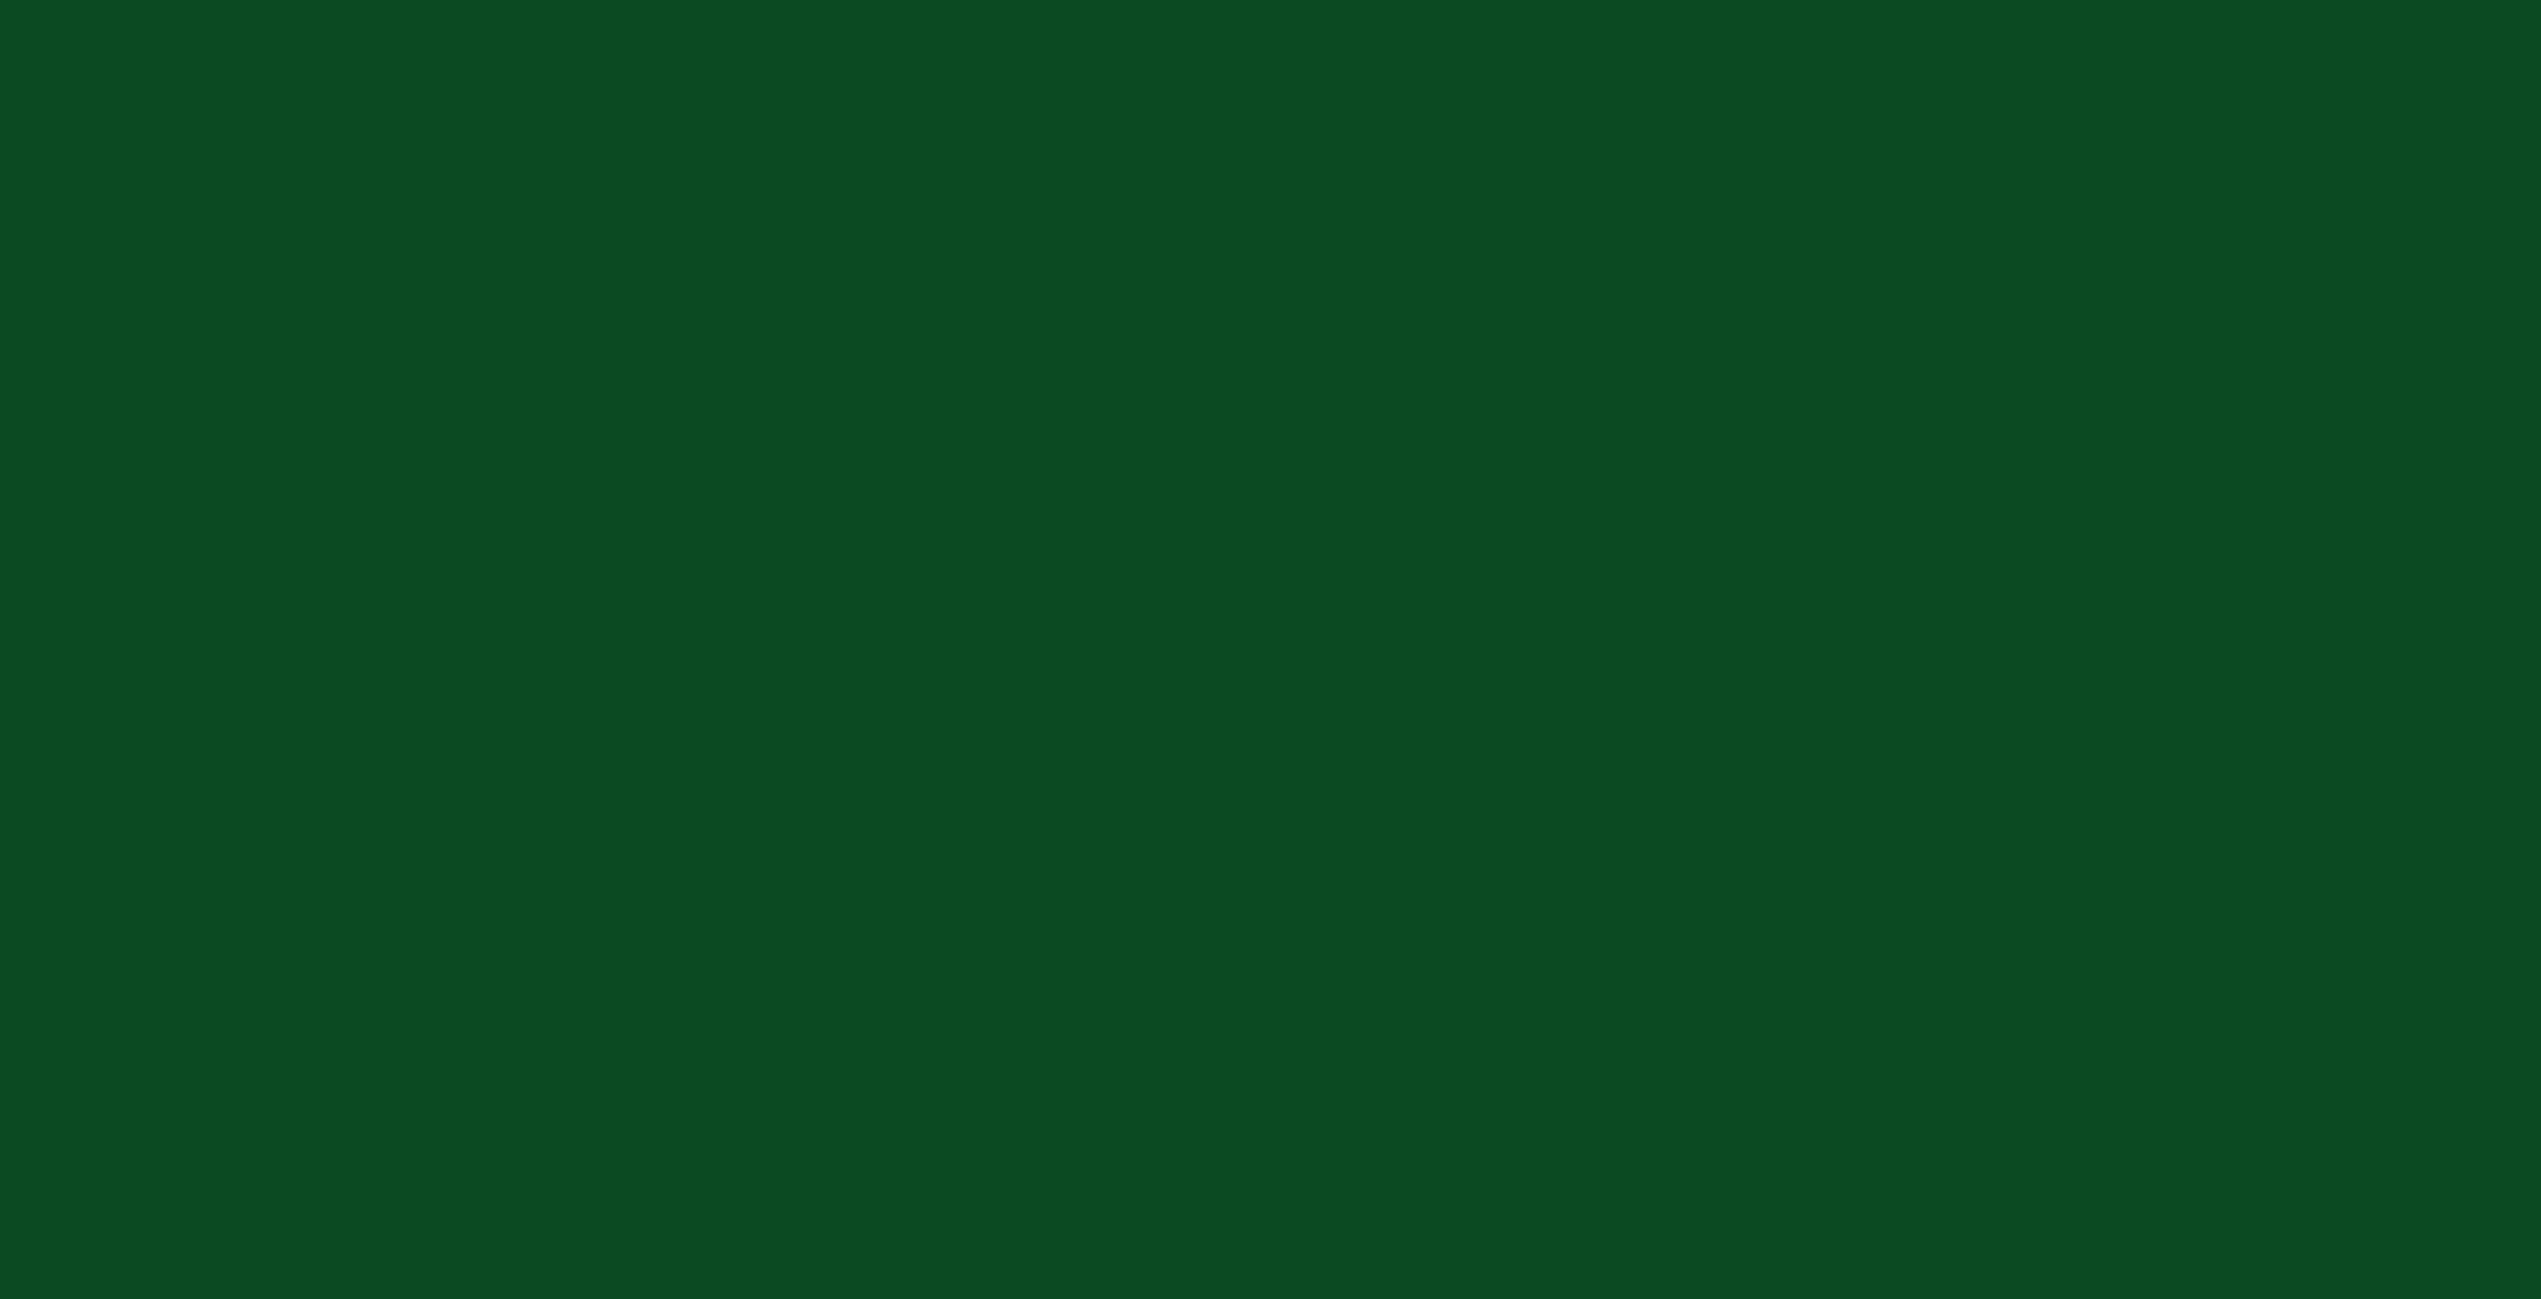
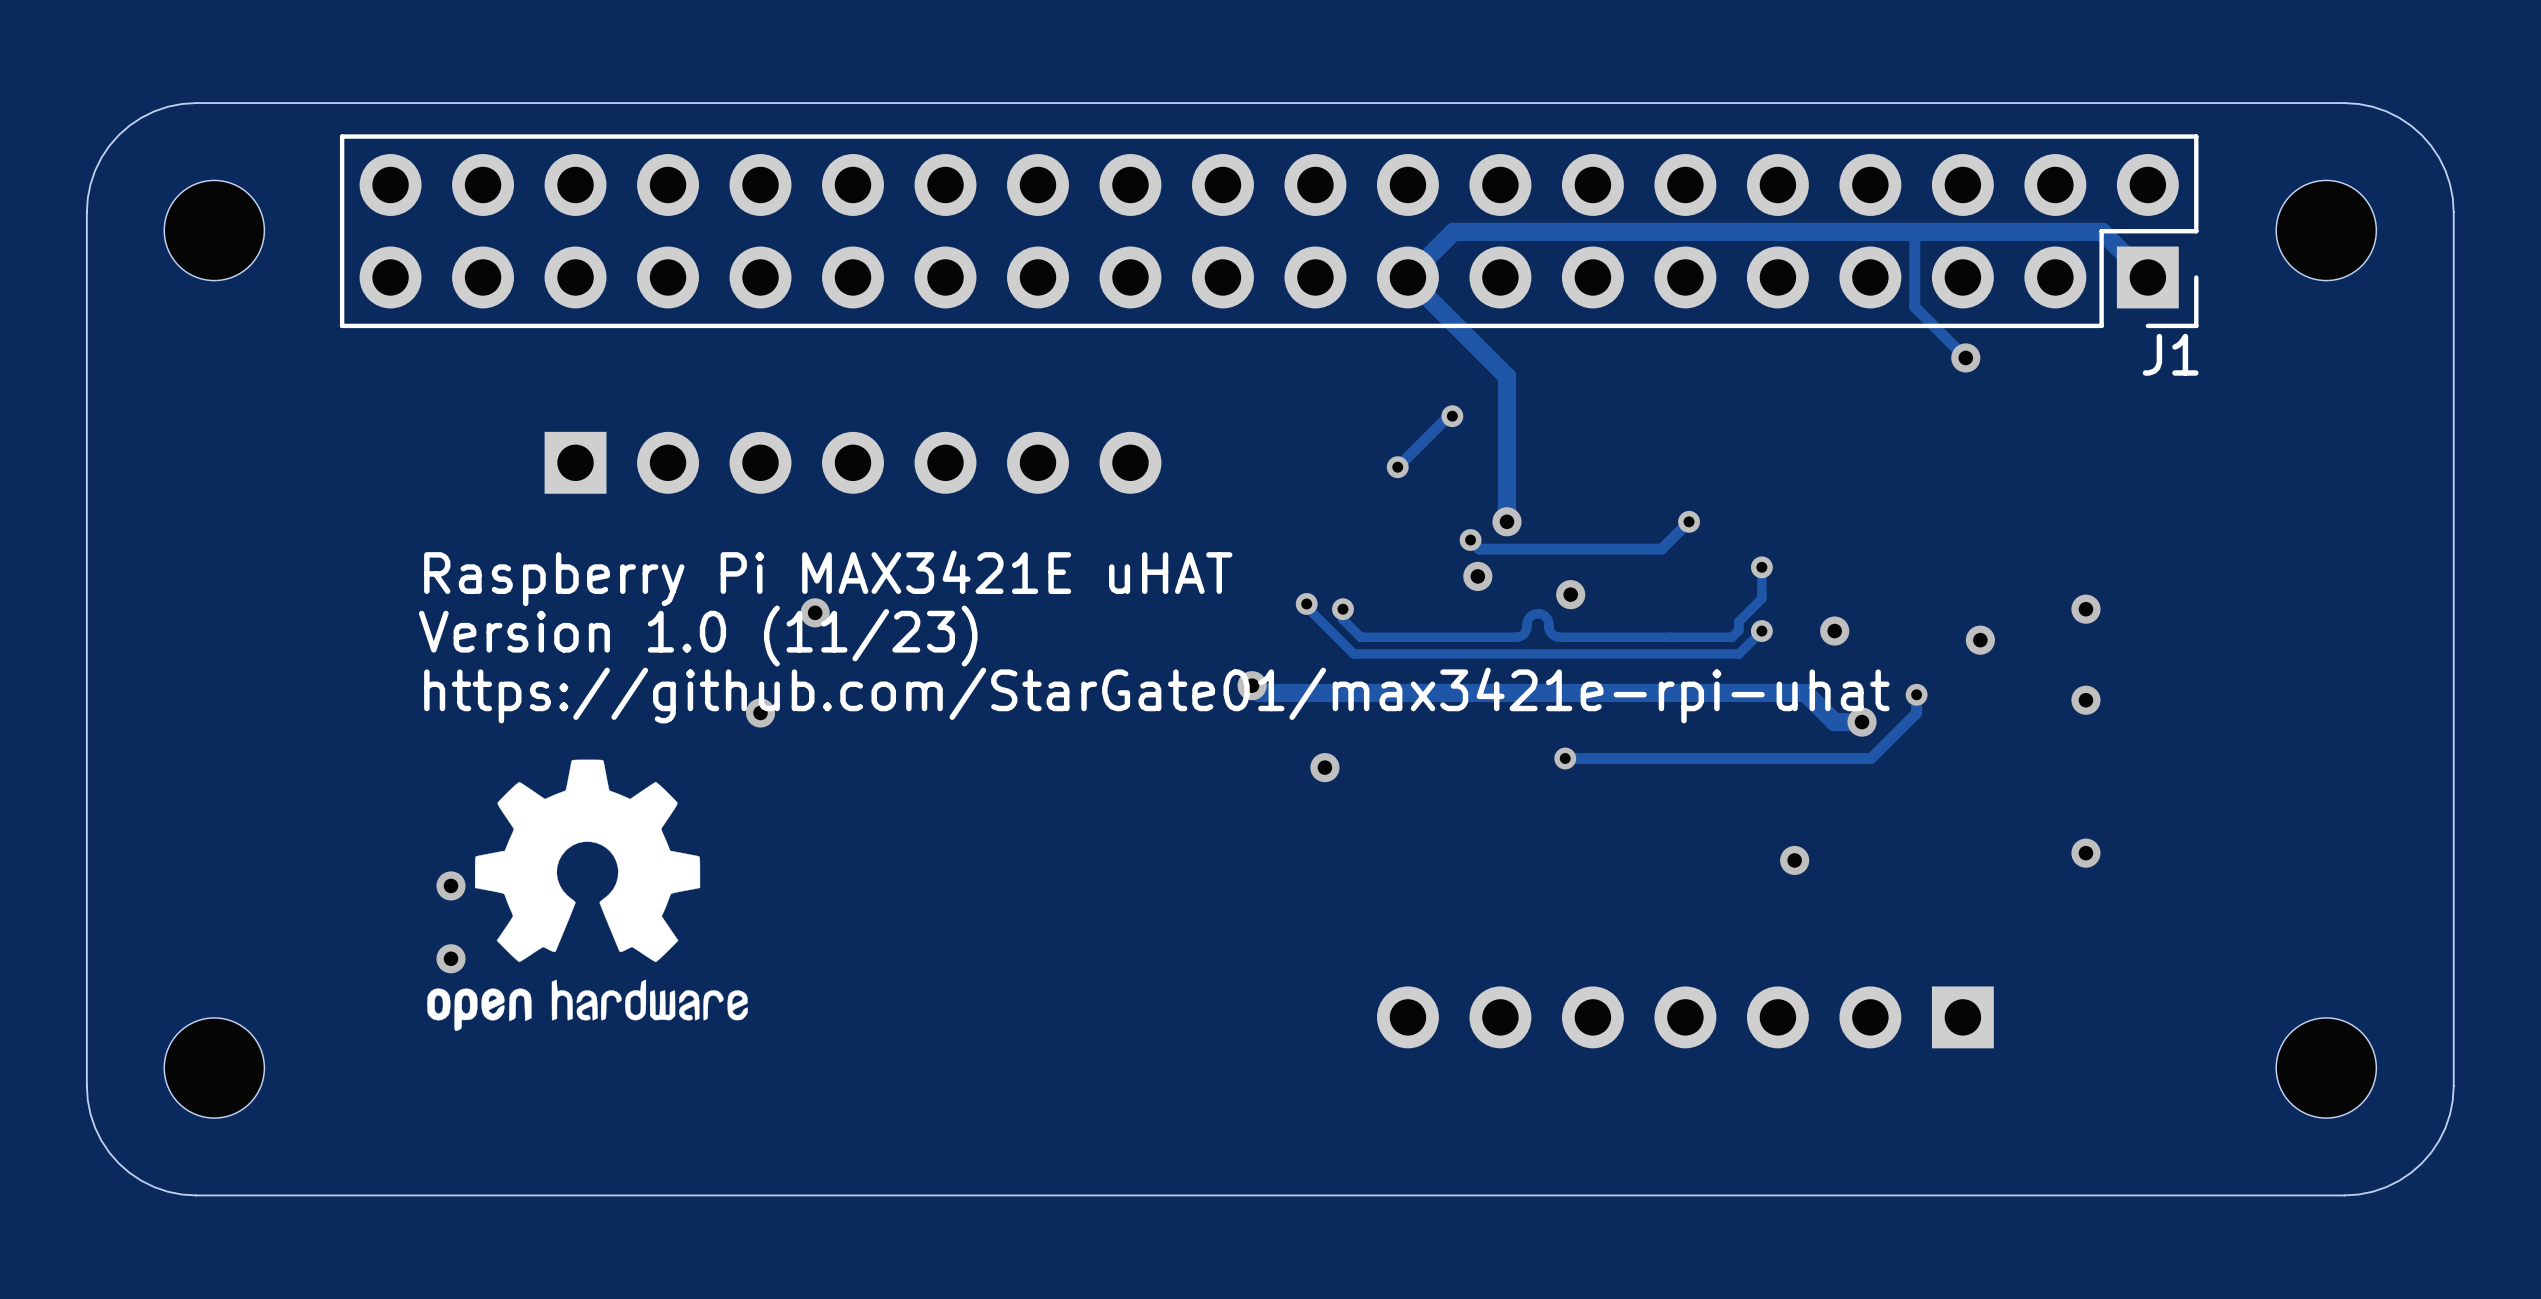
board edge: none -> (2344, 103) (196, 103) (181, 103) (154, 111) (129, 125) (109, 145) (95, 170) (90, 184) (86, 212) (86, 1086) (90, 1114) (95, 1128) (109, 1152) (129, 1172) (141, 1180) (167, 1191) (196, 1195) (2344, 1195) (2358, 1194) (2386, 1187) (2410, 1172) (2431, 1152) (2445, 1128) (2452, 1100) (2453, 212) (2450, 184) (2445, 170) (2431, 145) (2421, 135) (2399, 117) (2386, 111) (2358, 103) (2344, 103)
part: none -> (214, 230)
part: none -> (2326, 230)
J1: none -> (1269, 231)
track: none -> (1914, 231) (1914, 306) (1965, 357)
track: none -> (2147, 277) (2102, 231) (1453, 231) (1407, 277) (1506, 376) (1506, 521)
via: none -> (1965, 357)
track: none -> (1452, 416) (1448, 416) (1397, 467)
via: none -> (1452, 416)
part: none -> (853, 462)
via: none -> (1397, 467)
via: none -> (1506, 521)
track: none -> (1689, 521) (1661, 549) (1479, 549) (1470, 540)
via: none -> (1689, 521)
via: none -> (1470, 540)
track: none -> (1761, 567) (1761, 598) (1738, 621) (1738, 630) (1732, 637) (1558, 637) (1550, 631) (1546, 617) (1537, 613) (1529, 617) (1525, 631) (1517, 637) (1360, 637) (1342, 619) (1342, 609)
via: none -> (1761, 567)
via: none -> (1477, 576)
text: none -> Raspberry Pi MAX3421E uHAT (828, 578)
via: none -> (1570, 594)
track: none -> (1306, 603) (1306, 607) (1353, 653) (1738, 653) (1761, 631)
via: none -> (1306, 603)
via: none -> (1342, 609)
via: none -> (2085, 609)
via: none -> (815, 612)
via: none -> (1761, 631)
via: none -> (1834, 631)
text: none -> Version 1.0 (11/23) (698, 636)
via: none -> (1980, 640)
track: none -> (1252, 685) (1259, 692) (1805, 692) (1834, 722) (1862, 722)
via: none -> (1252, 685)
track: none -> (1916, 694) (1916, 712) (1871, 758) (1565, 758)
via: none -> (1916, 694)
text: none -> https://github.com/StarGate01/max3421e-rpi-uhat (1156, 695)
via: none -> (2085, 700)
via: none -> (760, 712)
via: none -> (1862, 722)
via: none -> (1565, 758)
drawing: none -> [427, 759, 748, 1032]
via: none -> (1324, 767)
via: none -> (2085, 853)
via: none -> (1794, 860)
via: none -> (451, 885)
via: none -> (451, 958)
part: none -> (1685, 1017)
part: none -> (214, 1068)
part: none -> (2326, 1068)

